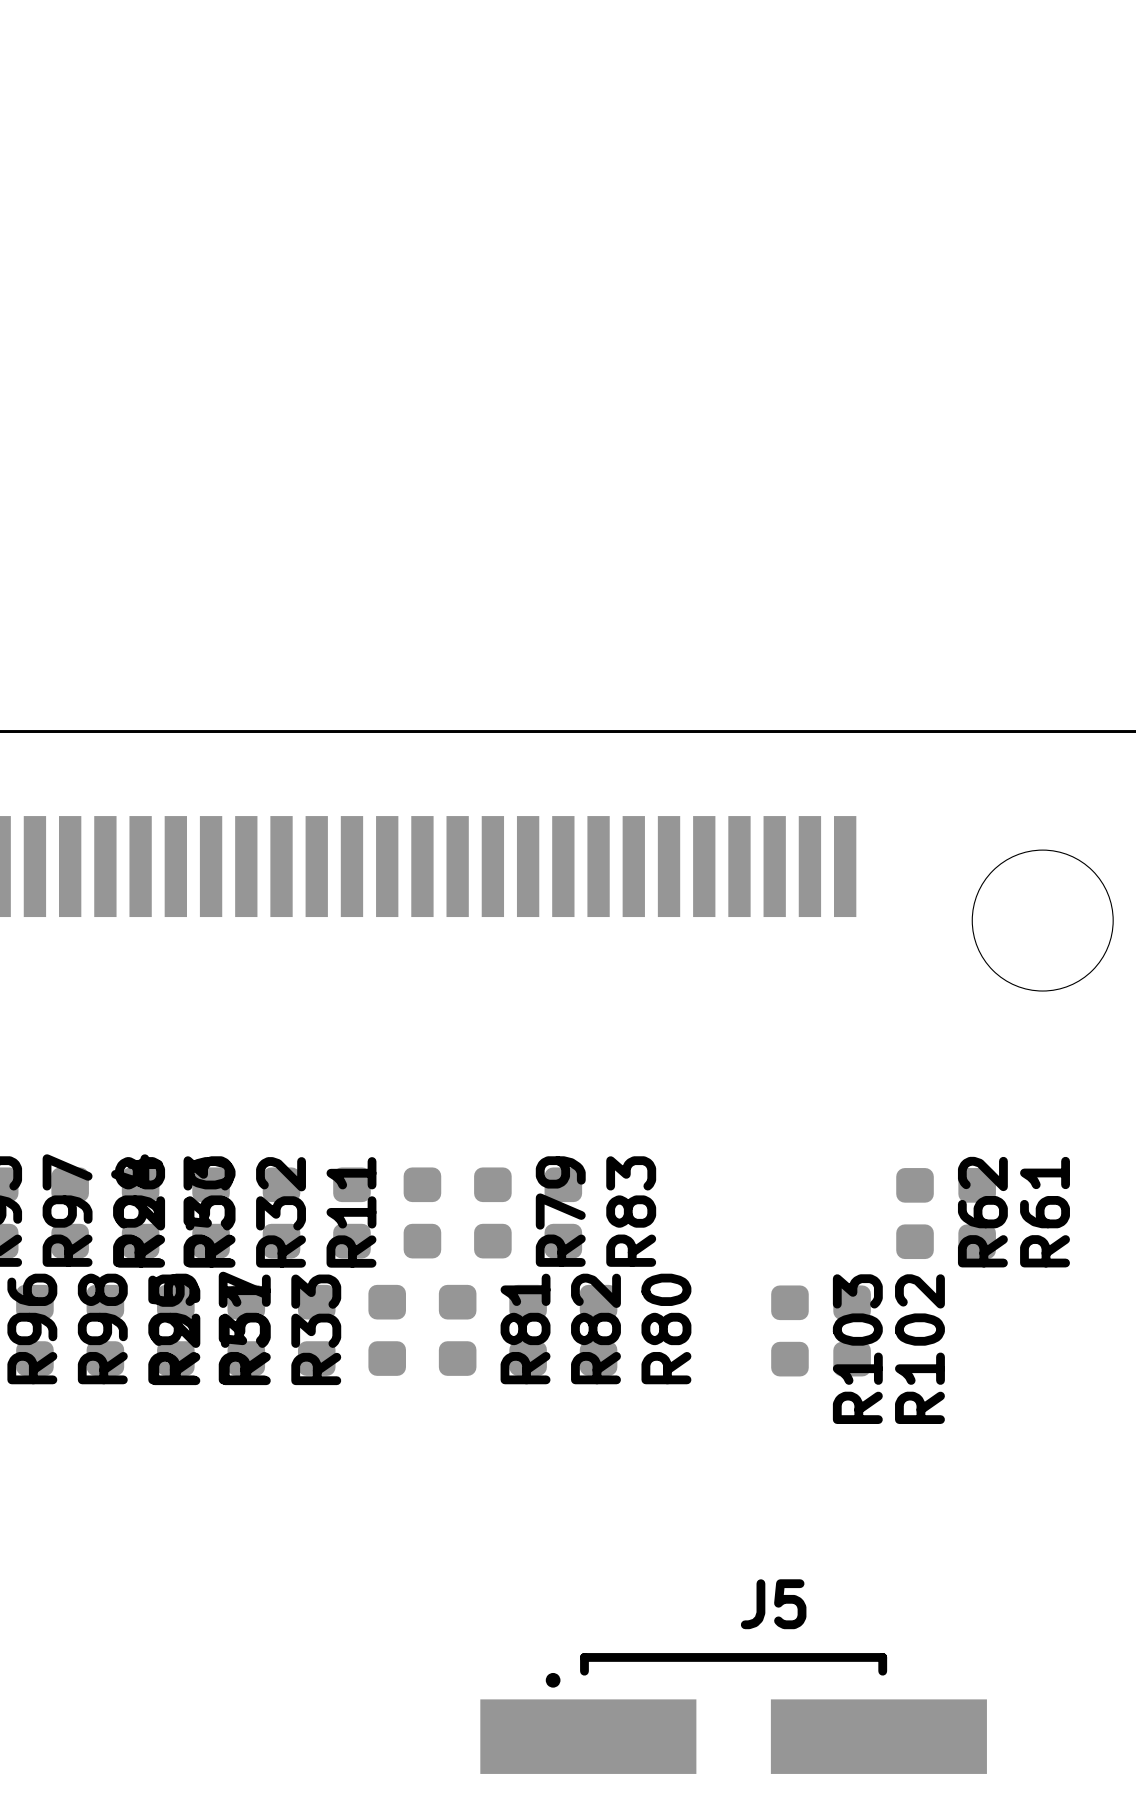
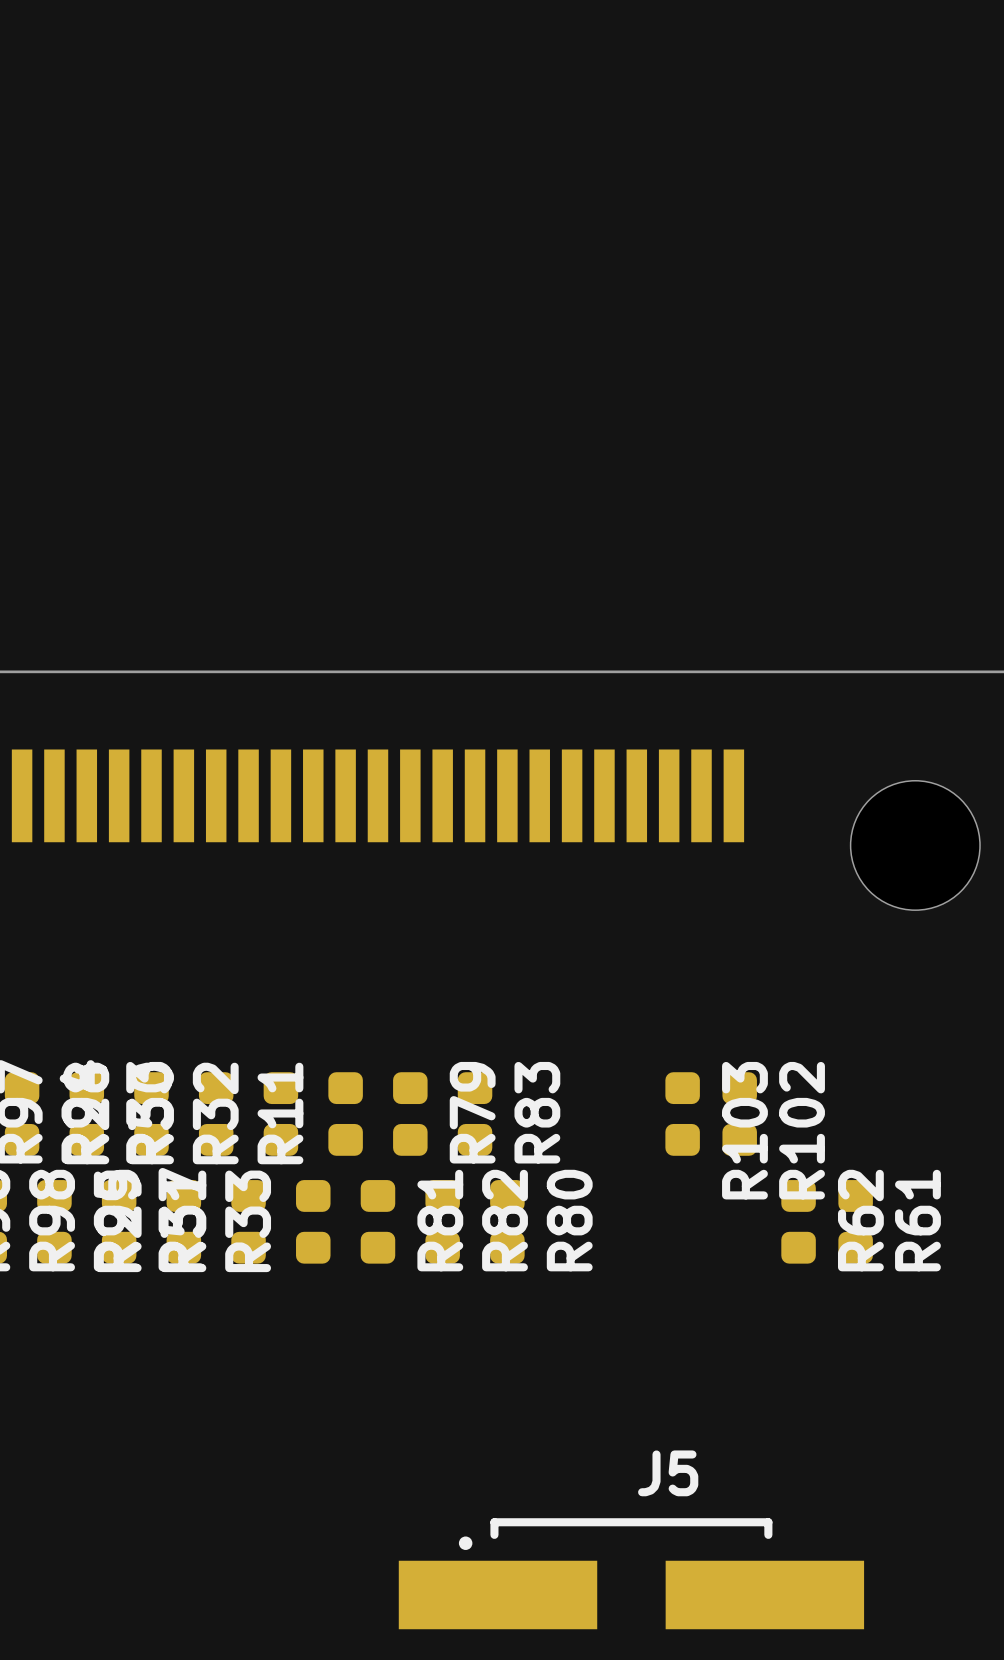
R62 position: (915, 1213) -> (798, 1221)
R61 position: (977, 1213) -> (855, 1221)
R103 position: (789, 1330) -> (682, 1114)
R102 position: (852, 1330) -> (739, 1114)

